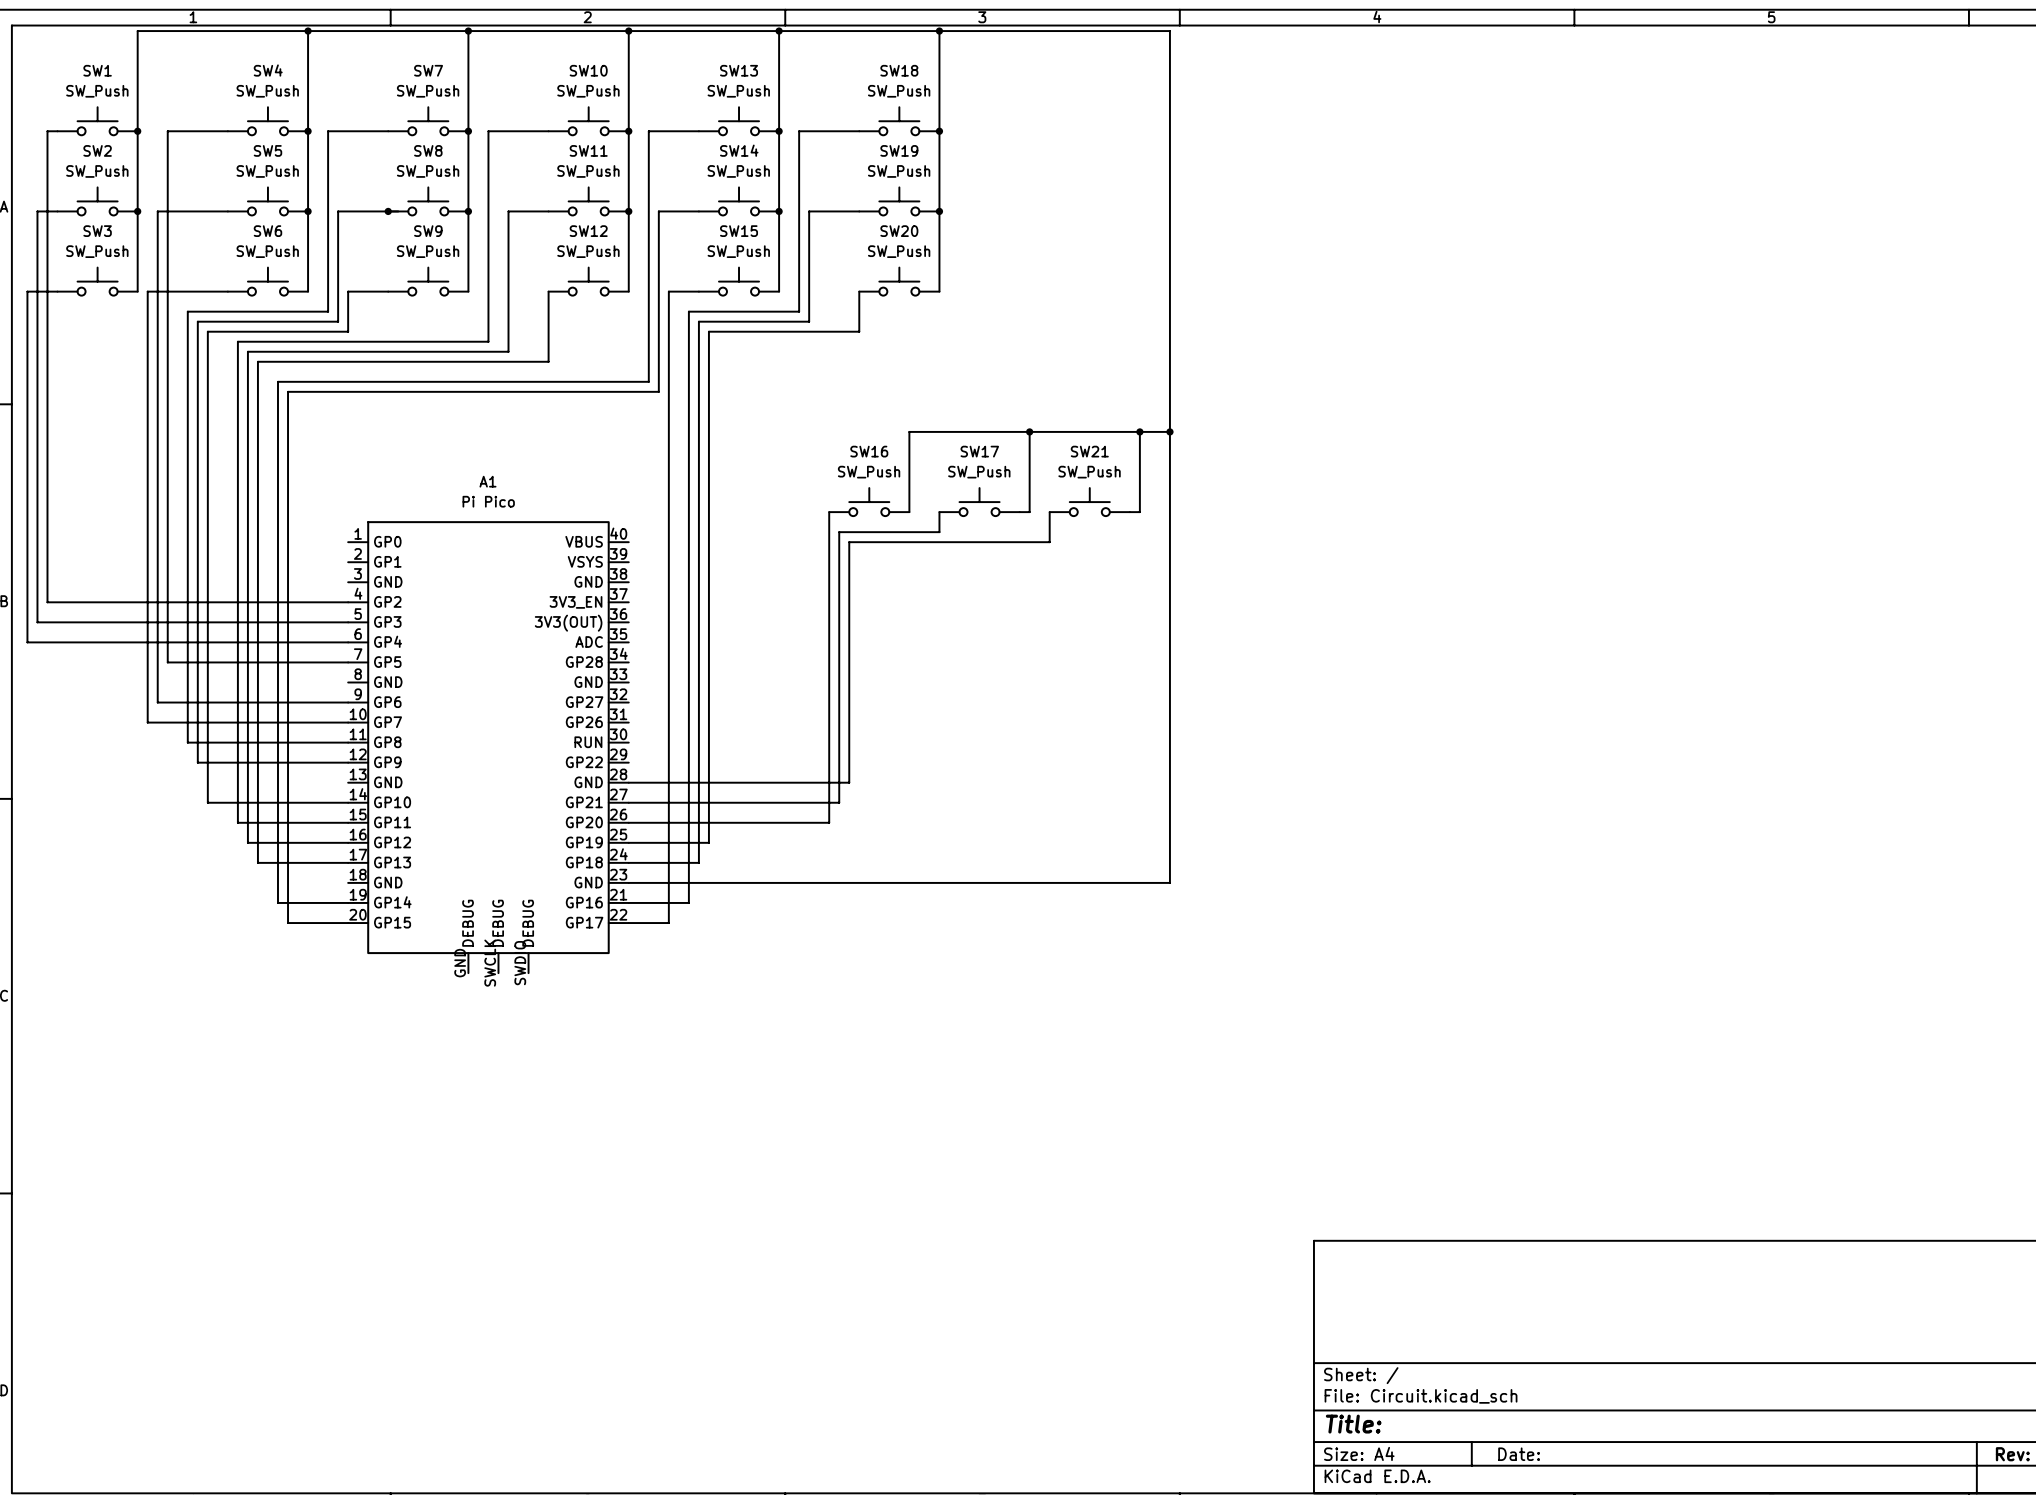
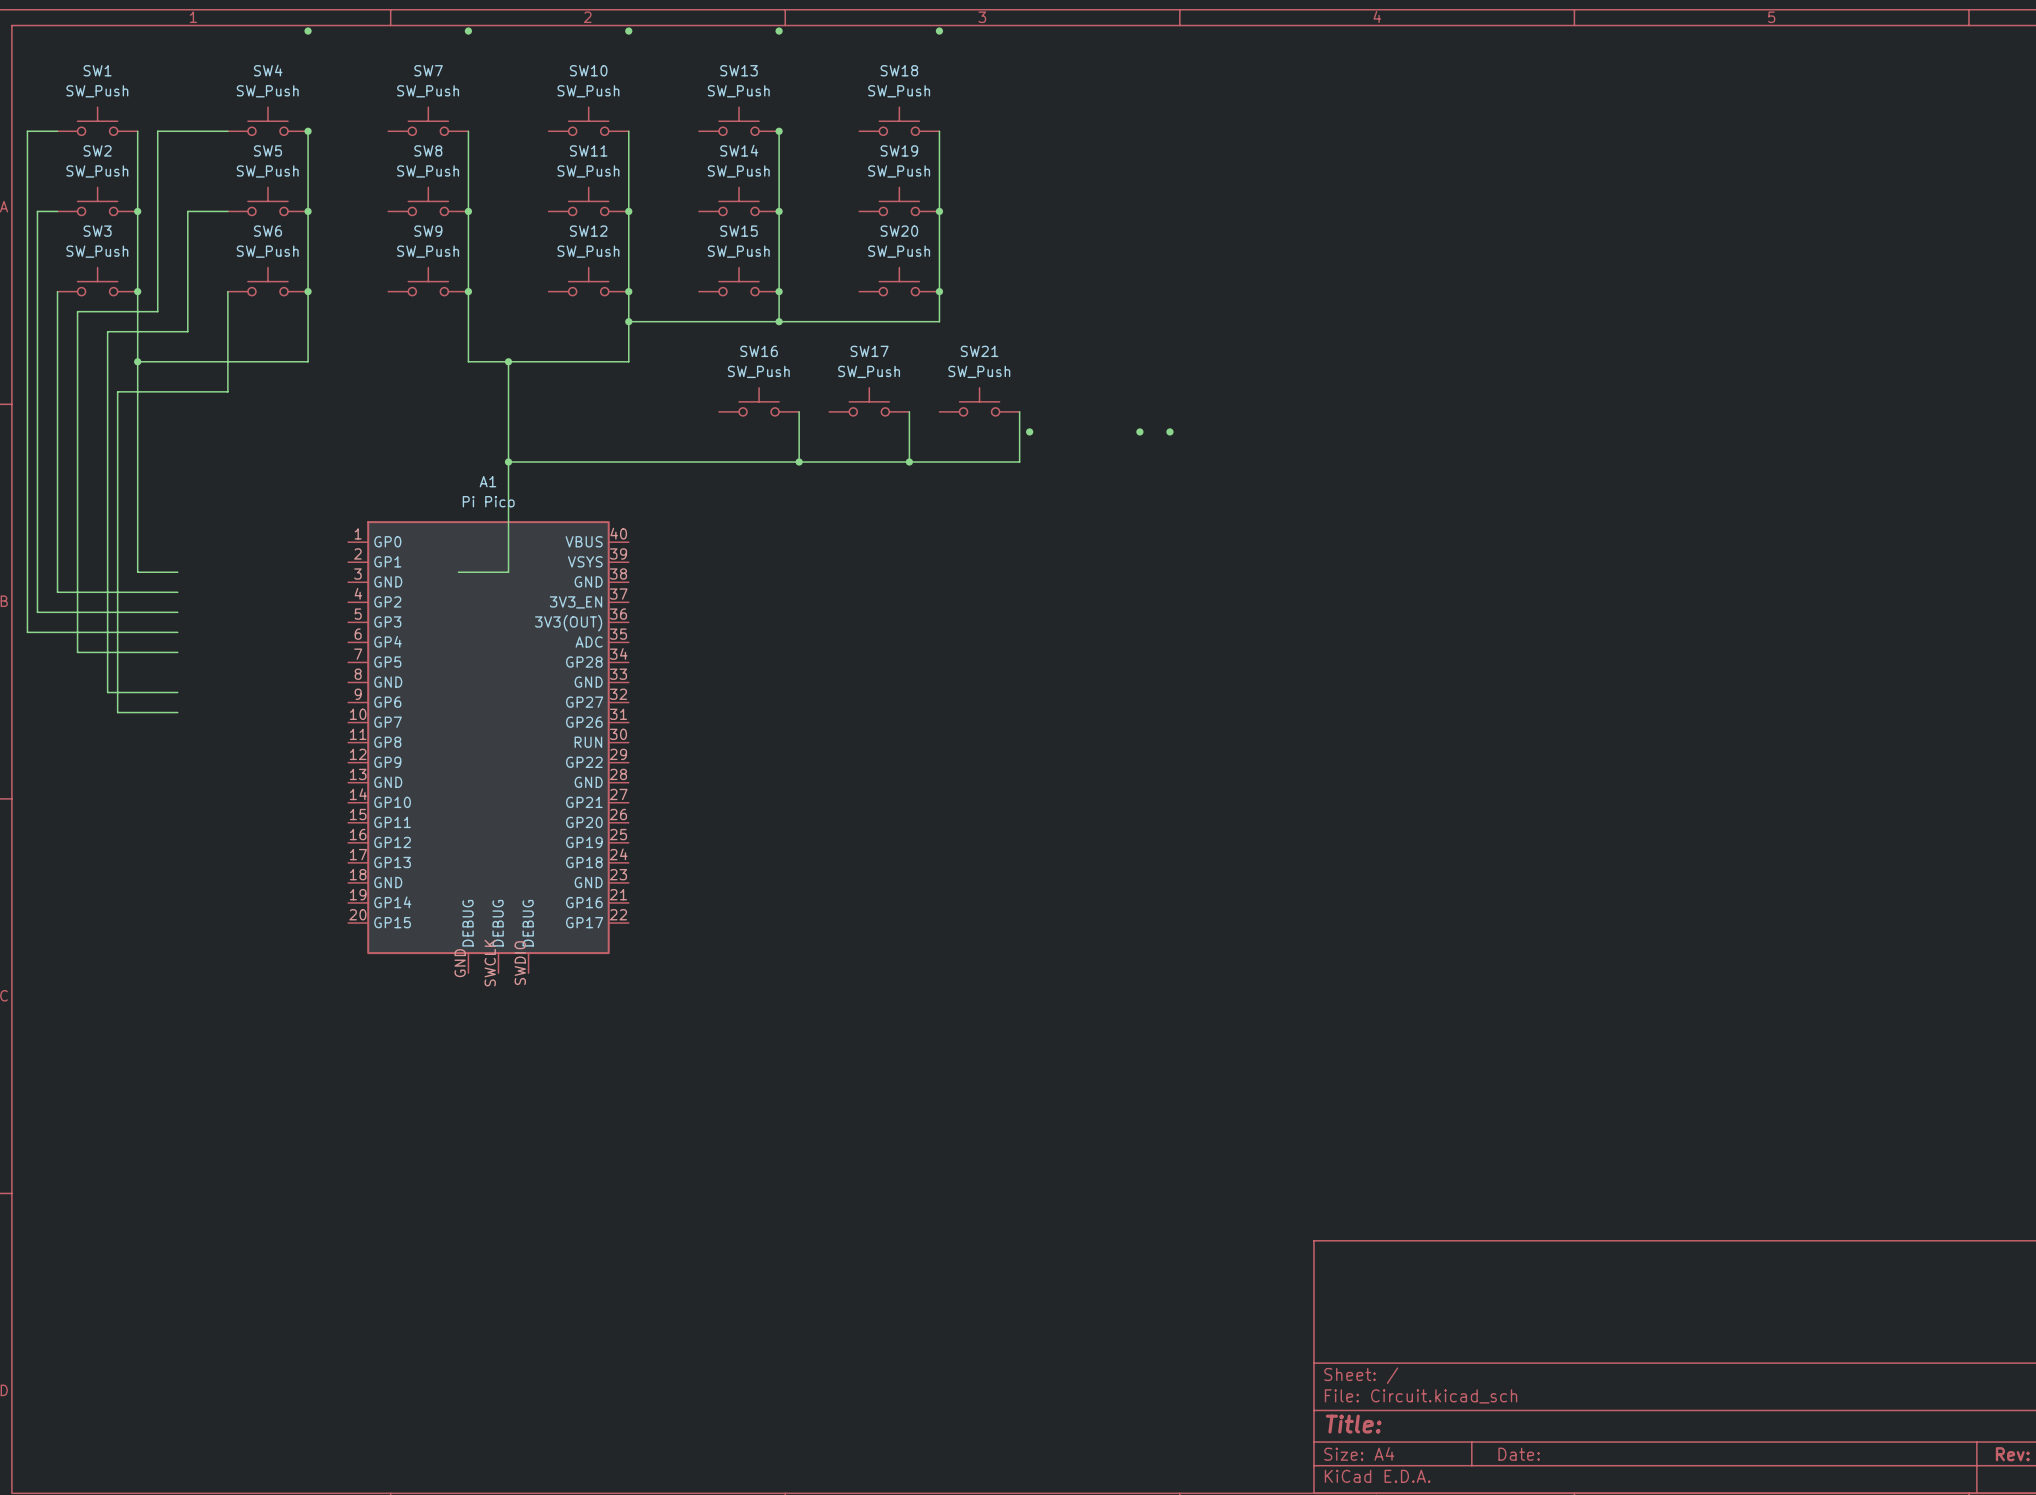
wire: (308, 31) (308, 131) -> none
wire: (468, 31) (468, 131) -> none
wire: (628, 31) (628, 131) -> none
wire: (779, 31) (779, 131) -> none
wire: (939, 31) (939, 131) -> none
wire: (47, 131) (47, 602) (348, 602) -> none
wire: (137, 131) (137, 31) (1169, 31) (1169, 882) (628, 882) -> none
junction: (137, 131) -> none
wire: (167, 131) (167, 662) (348, 662) -> none
wire: (388, 131) (328, 131) (328, 311) (187, 311) -> (187, 211) (187, 311)
junction: (468, 131) -> none
wire: (548, 131) (488, 131) (488, 341) (237, 341) (237, 822) (348, 822) -> none
junction: (628, 131) -> none
wire: (698, 131) (648, 131) (648, 381) (277, 381) (277, 902) (348, 902) -> none
wire: (859, 131) (799, 131) (799, 311) (688, 311) (688, 902) (628, 902) -> none
junction: (939, 131) -> none
wire: (157, 211) (187, 211) -> (157, 211) (157, 131) (167, 131)
junction: (388, 211) -> none
wire: (398, 211) (338, 211) (338, 321) (197, 321) (197, 762) (348, 762) -> none
wire: (548, 211) (508, 211) (508, 351) (247, 351) (247, 842) (348, 842) -> none
wire: (698, 211) (658, 211) (658, 391) (288, 391) (288, 923) (348, 923) -> none
wire: (859, 211) (809, 211) (809, 321) -> (939, 291) (939, 321) (809, 321)
wire: (27, 291) (57, 291) -> (27, 291) (27, 131) (47, 131)
wire: none -> (57, 291) (57, 592) (177, 592)
wire: none -> (137, 291) (137, 572) (177, 572)
junction: none -> (137, 291)
wire: (227, 291) (147, 291) (147, 722) (348, 722) -> (227, 291) (227, 391) (117, 391) (117, 712) (177, 712)
junction: none -> (308, 291)
wire: (388, 291) (348, 291) (348, 331) (207, 331) (207, 802) (348, 802) -> none
wire: none -> (468, 291) (468, 361)
junction: none -> (468, 291)
wire: (548, 291) (548, 361) -> (628, 291) (628, 361) (548, 361)
junction: none -> (628, 291)
wire: (698, 291) (668, 291) (668, 923) (628, 923) -> none
wire: none -> (779, 291) (779, 321)
junction: none -> (779, 291)
wire: (859, 291) (859, 331) (708, 331) (708, 842) (628, 842) -> none
junction: none -> (939, 291)
wire: (157, 311) (157, 702) (348, 702) -> (157, 311) (77, 311) (77, 652) (177, 652)
junction: none -> (628, 321)
wire: (698, 321) (698, 862) (628, 862) -> (698, 321) (628, 321)
junction: none -> (779, 321)
wire: (187, 331) (187, 742) (348, 742) -> (187, 331) (107, 331) (107, 692) (177, 692)
junction: none -> (137, 361)
wire: (257, 361) (257, 862) (348, 862) -> (257, 361) (137, 361)
wire: (308, 361) (468, 361) -> (308, 361) (308, 291)
wire: none -> (508, 361) (508, 572) (458, 572)
junction: none -> (508, 361)
wire: none -> (1019, 411) (1019, 462) (508, 462)
wire: (909, 431) (1169, 431) -> (909, 431) (909, 411)
wire: (1029, 431) (1029, 512) (1019, 512) -> none
wire: (1139, 431) (1139, 512) (1129, 512) -> none
junction: none -> (508, 462)
junction: none -> (799, 462)
wire: (909, 462) (909, 512) -> (799, 411) (799, 462)
junction: none -> (909, 462)
SW16 position: (869, 502) -> (759, 401)
SW17 position: (979, 502) -> (869, 401)
SW21 position: (1089, 502) -> (979, 401)
wire: (829, 512) (829, 822) (628, 822) -> none
wire: (939, 512) (939, 532) (839, 532) (839, 802) (628, 802) -> none
wire: (1049, 512) (1049, 542) (849, 542) (849, 782) (628, 782) -> none
wire: (37, 612) (37, 622) (348, 622) -> (37, 612) (177, 612)
wire: (27, 632) (27, 642) (348, 642) -> (27, 632) (177, 632)

